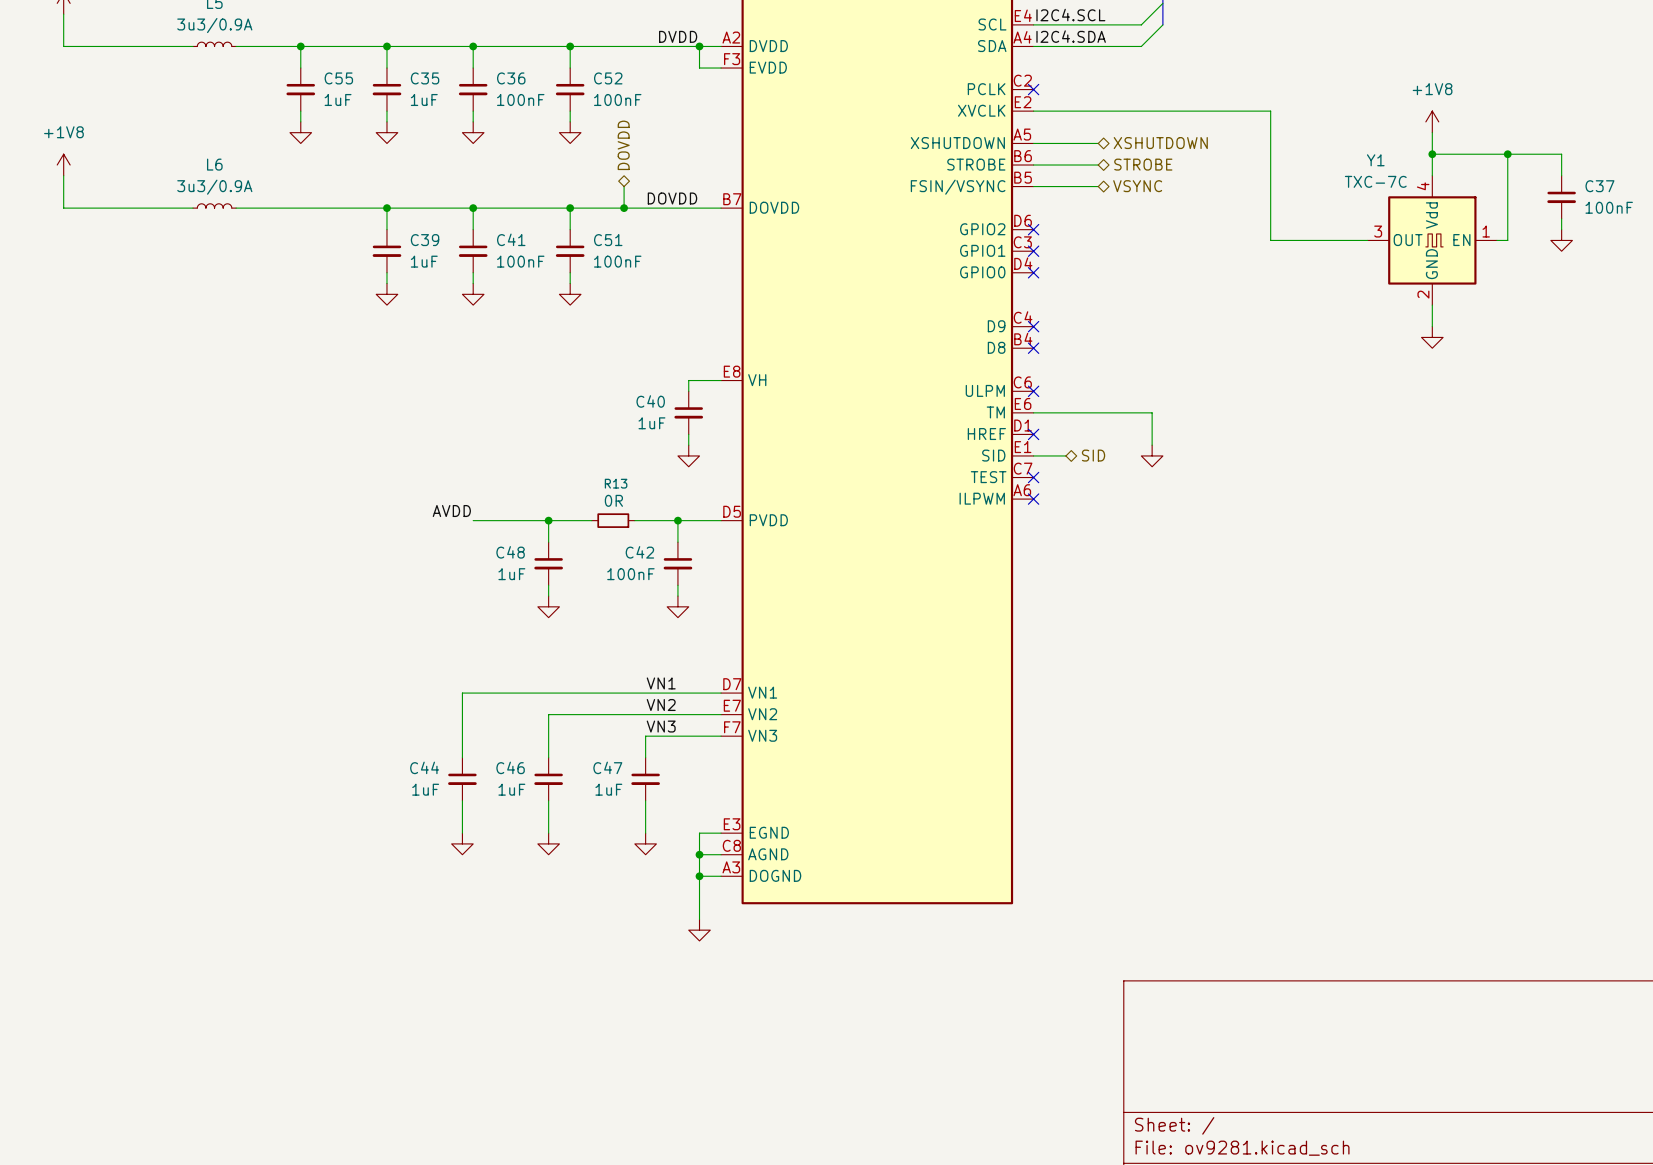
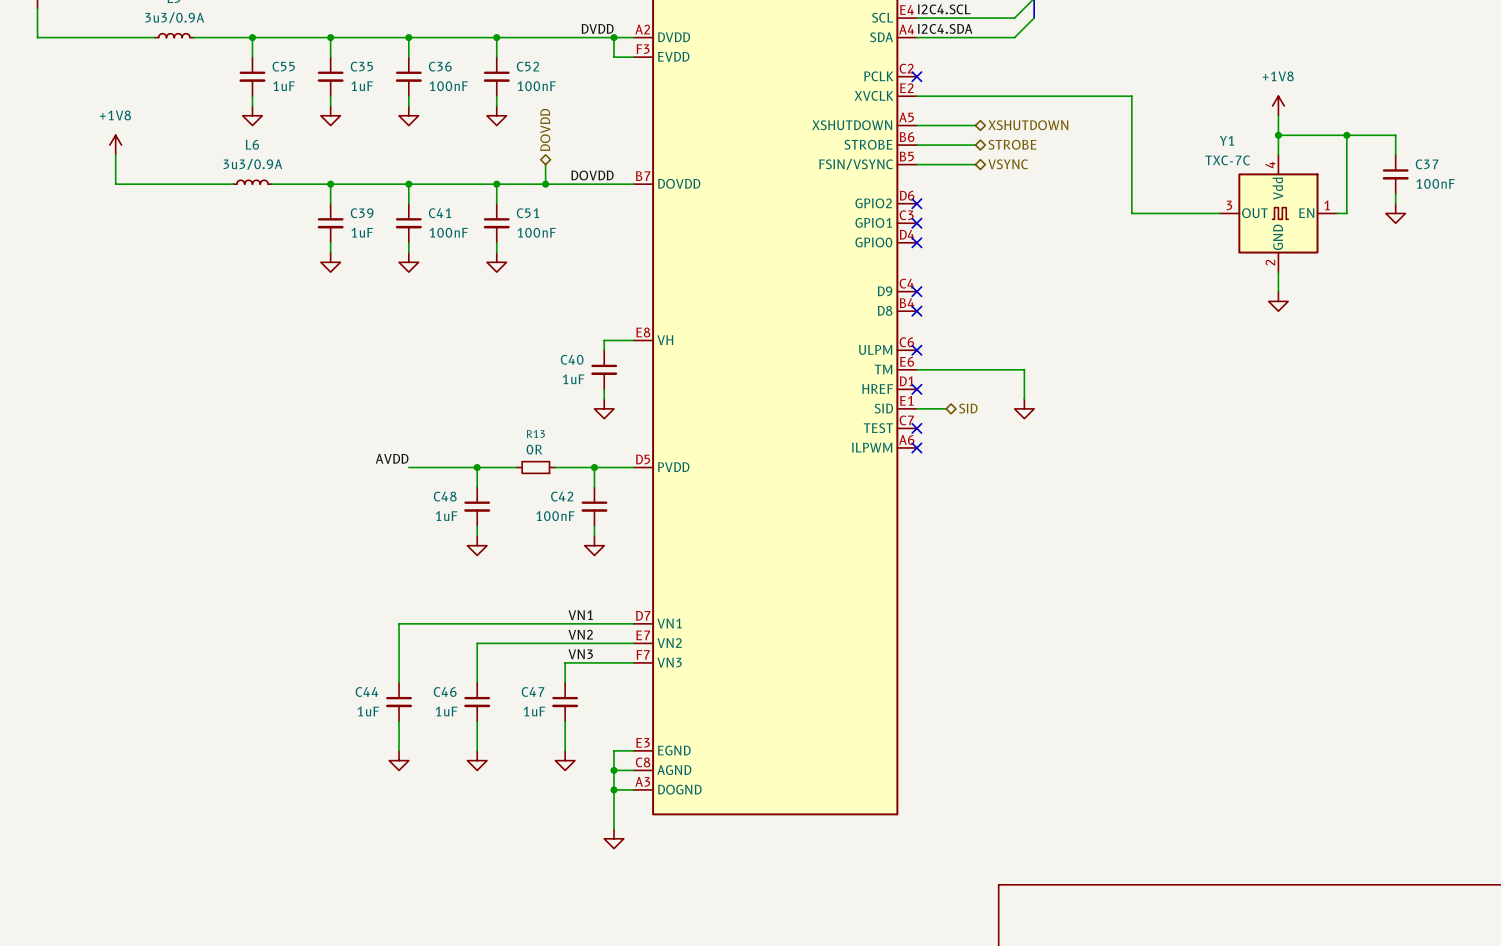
power symbol position: +1V8 (63, 165) -> +1V8 (115, 145)
wire: (63, 175) (63, 208) (149, 208) -> (115, 154) (115, 184)
L6 position: (214, 205) -> (252, 182)
wire: (279, 208) (322, 208) -> (154, 184) (193, 184)

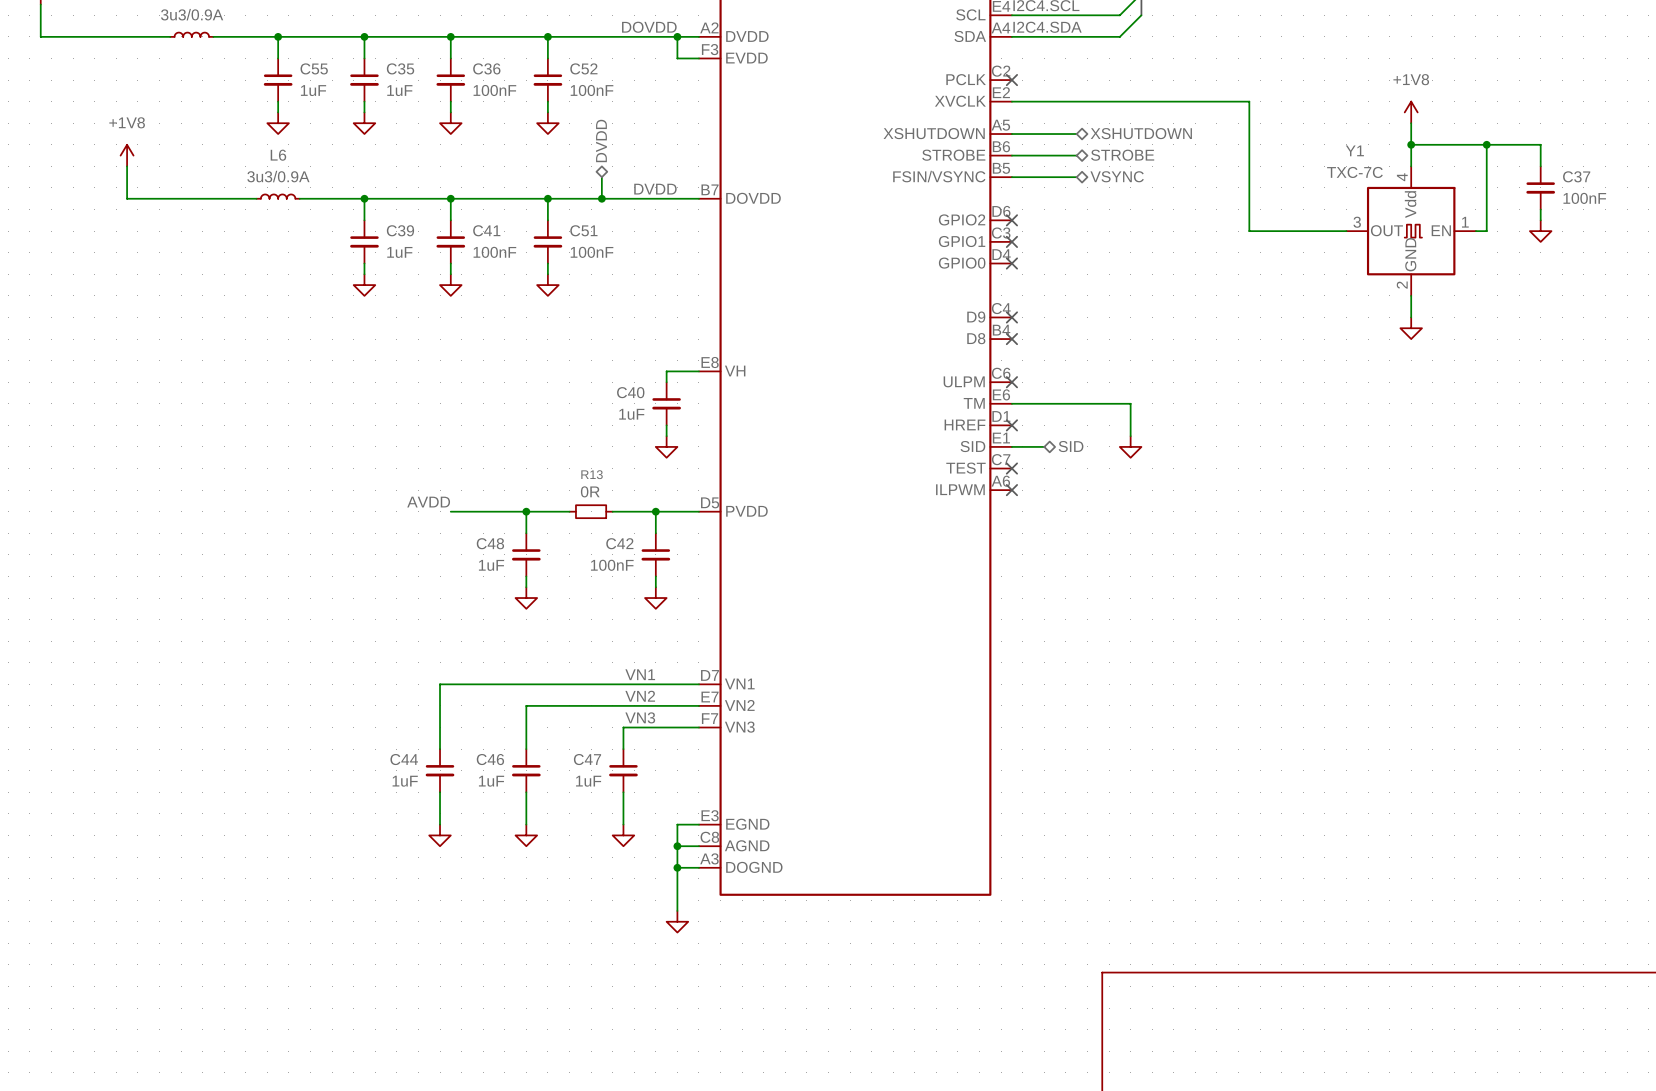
label: DVDD (597, 28) -> DOVDD (649, 27)
hierarchical label: DOVDD (545, 130) -> DVDD (601, 140)
label: DOVDD (592, 175) -> DVDD (655, 189)

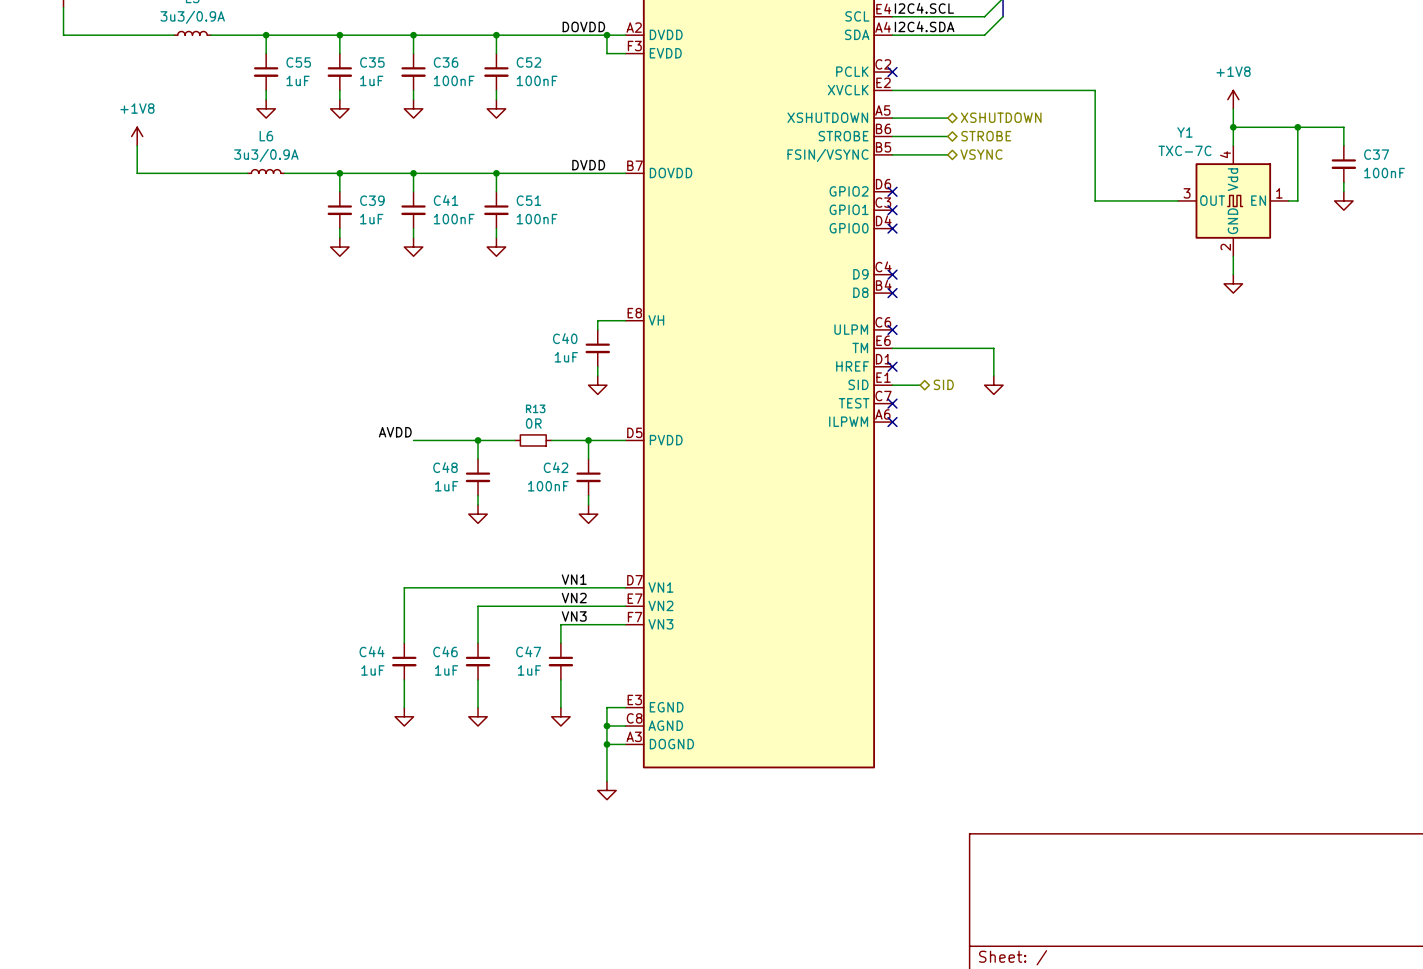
hierarchical label: DVDD (601, 140) -> none
wire: (601, 177) (601, 198) -> none
junction: (601, 198) -> none

